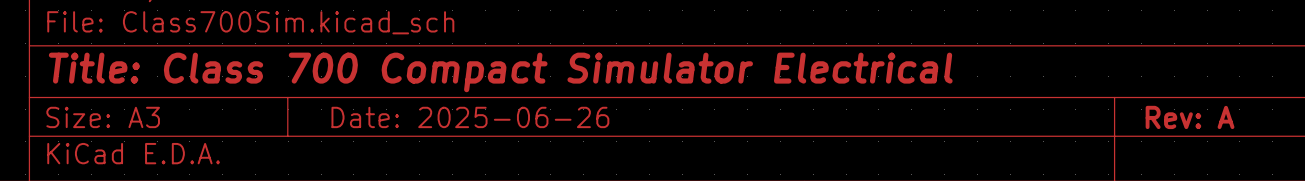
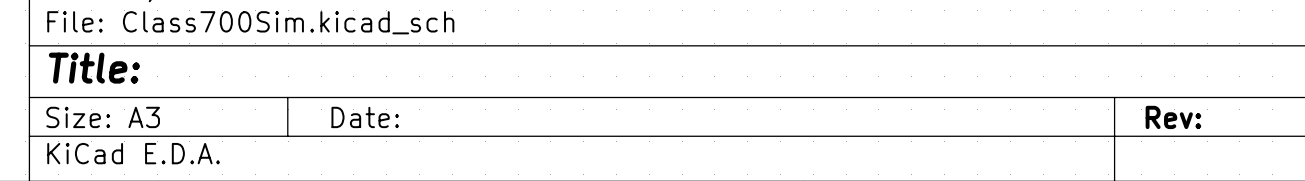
title block: Title: Class 700 Compact Simulator Electrical (500, 72) -> Title: (94, 68)
title block: Date: 2025-06-26 (470, 117) -> Date: (365, 117)
title block: Rev: A (1190, 117) -> Rev: (1173, 117)

